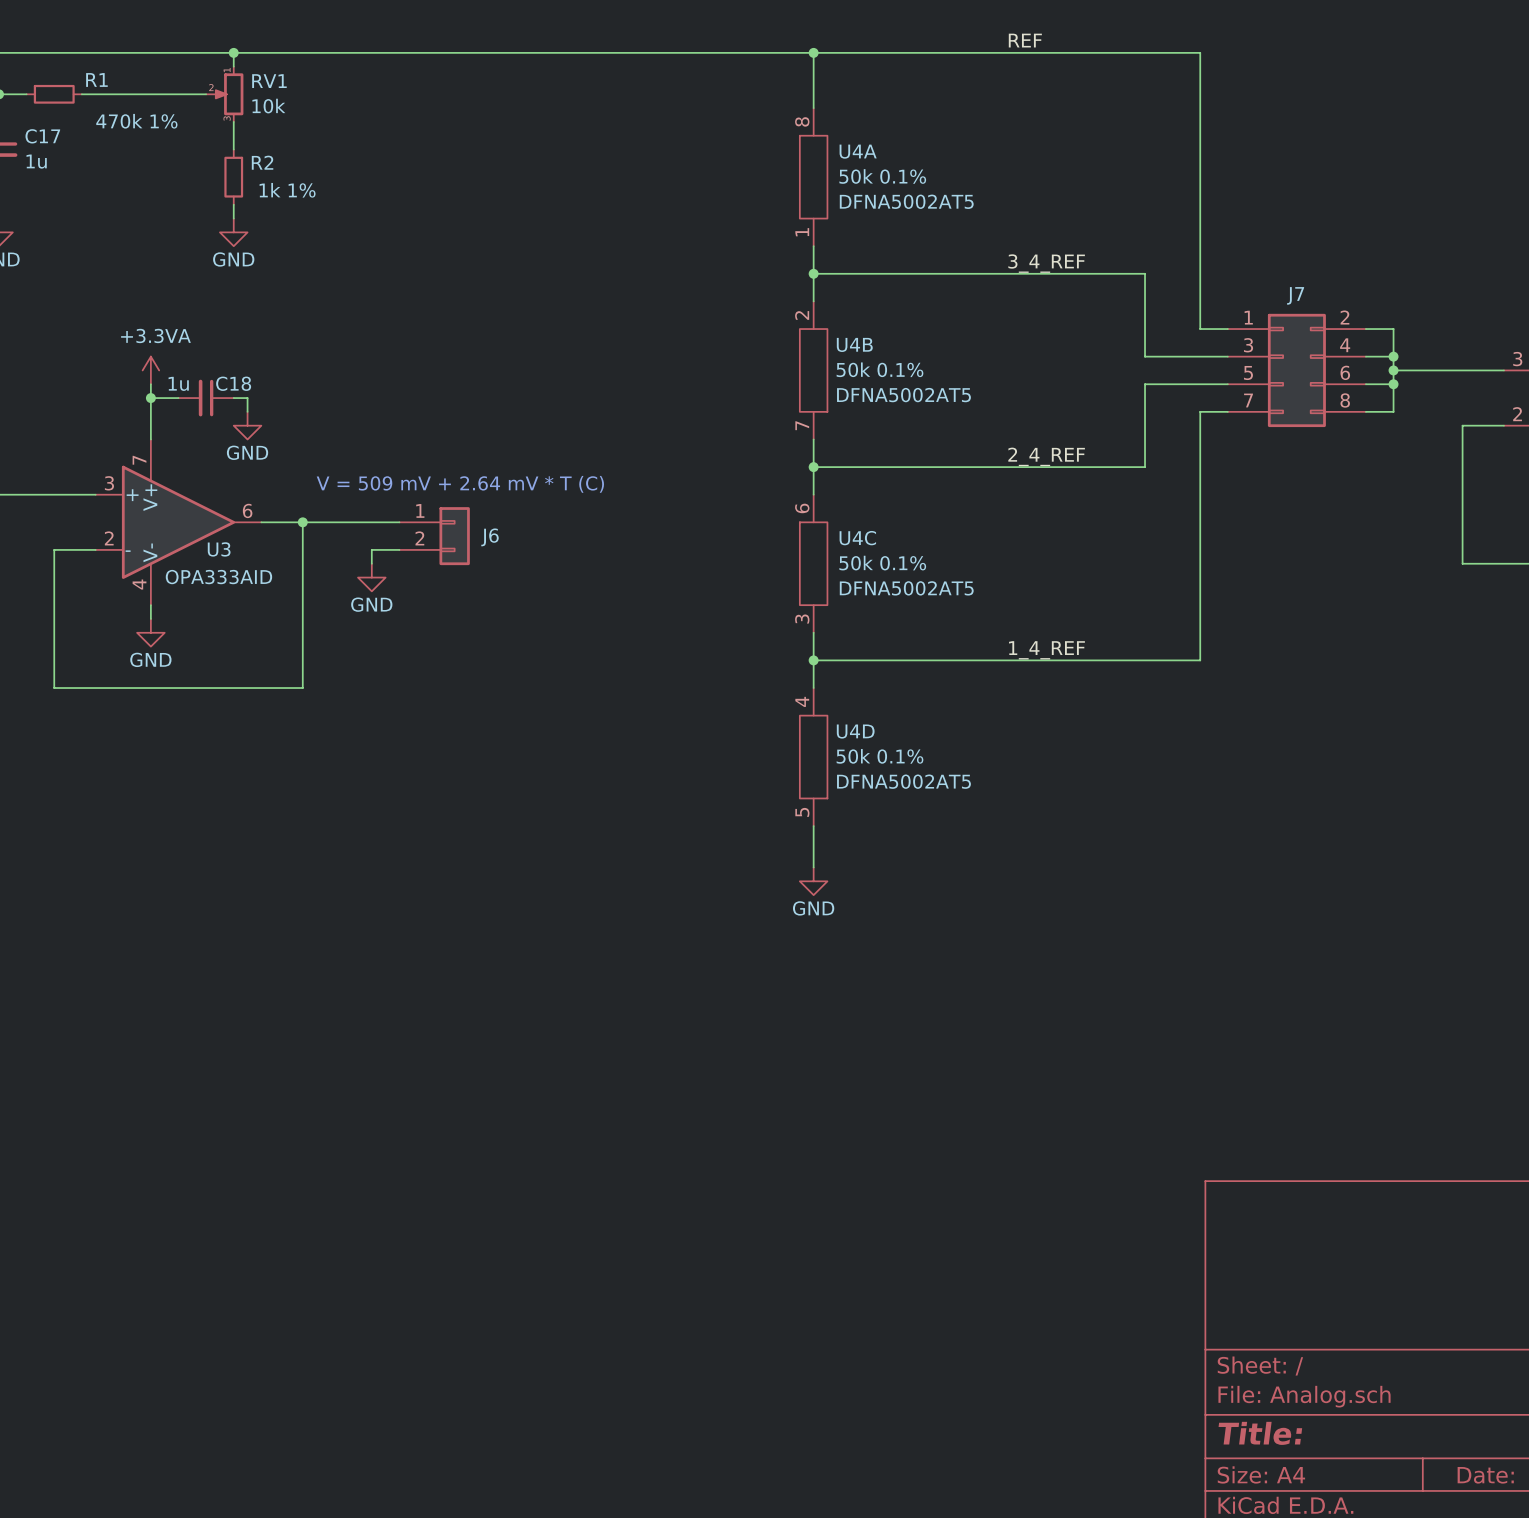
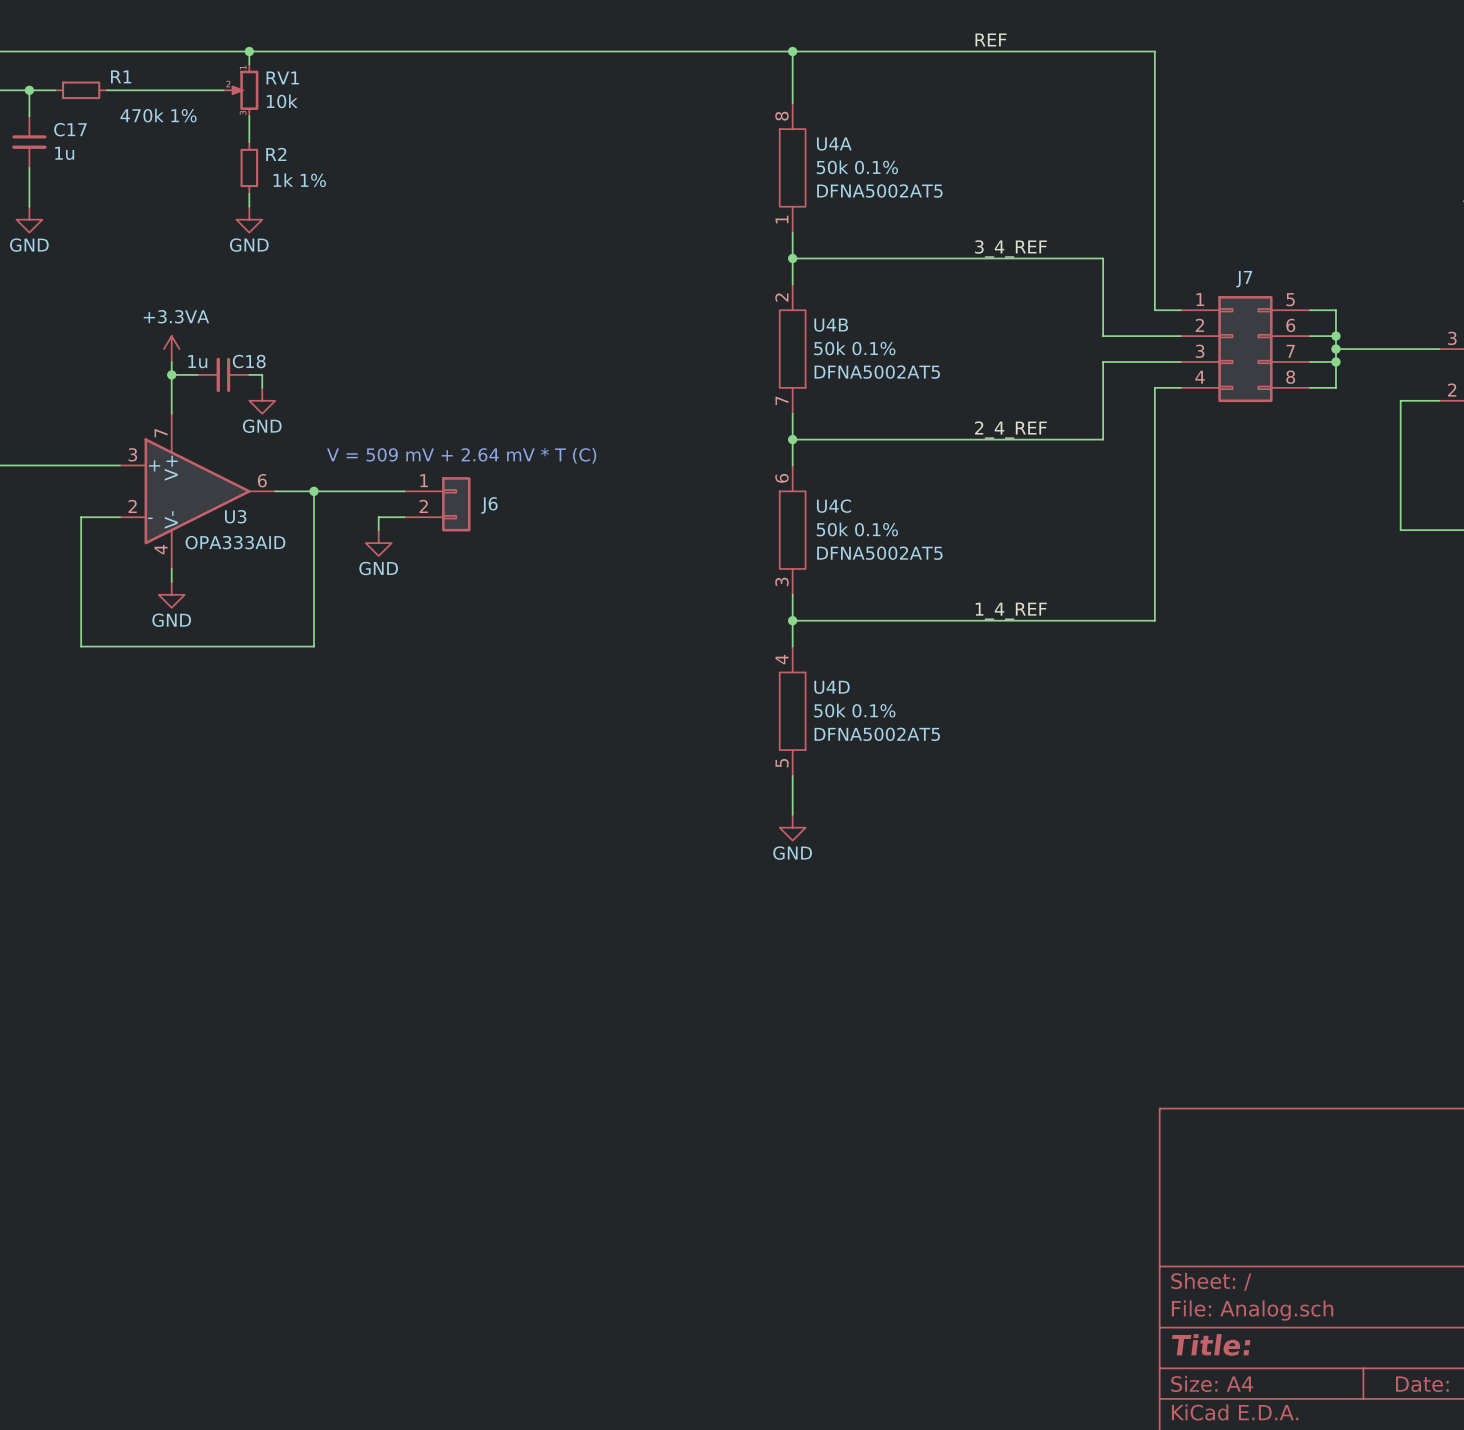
J7 pin number: 2 (1344, 317) -> 5 (1290, 299)
J7 pin number: 3 (1248, 345) -> 2 (1199, 325)
J7 pin number: 4 (1345, 345) -> 6 (1290, 325)
J7 pin number: 6 (1345, 372) -> 7 (1290, 351)
J7 pin number: 5 (1248, 373) -> 3 (1200, 351)
J7 pin number: 7 (1248, 400) -> 4 (1200, 377)

